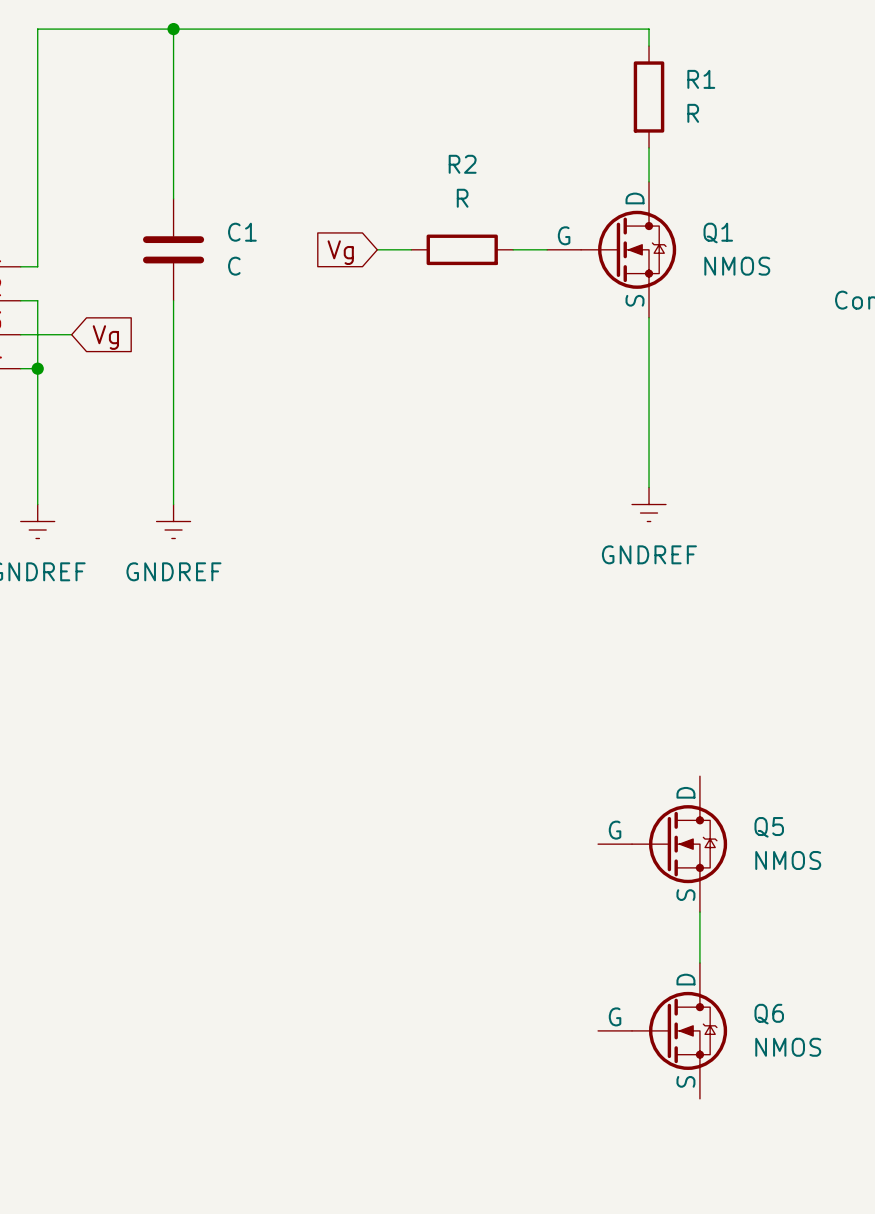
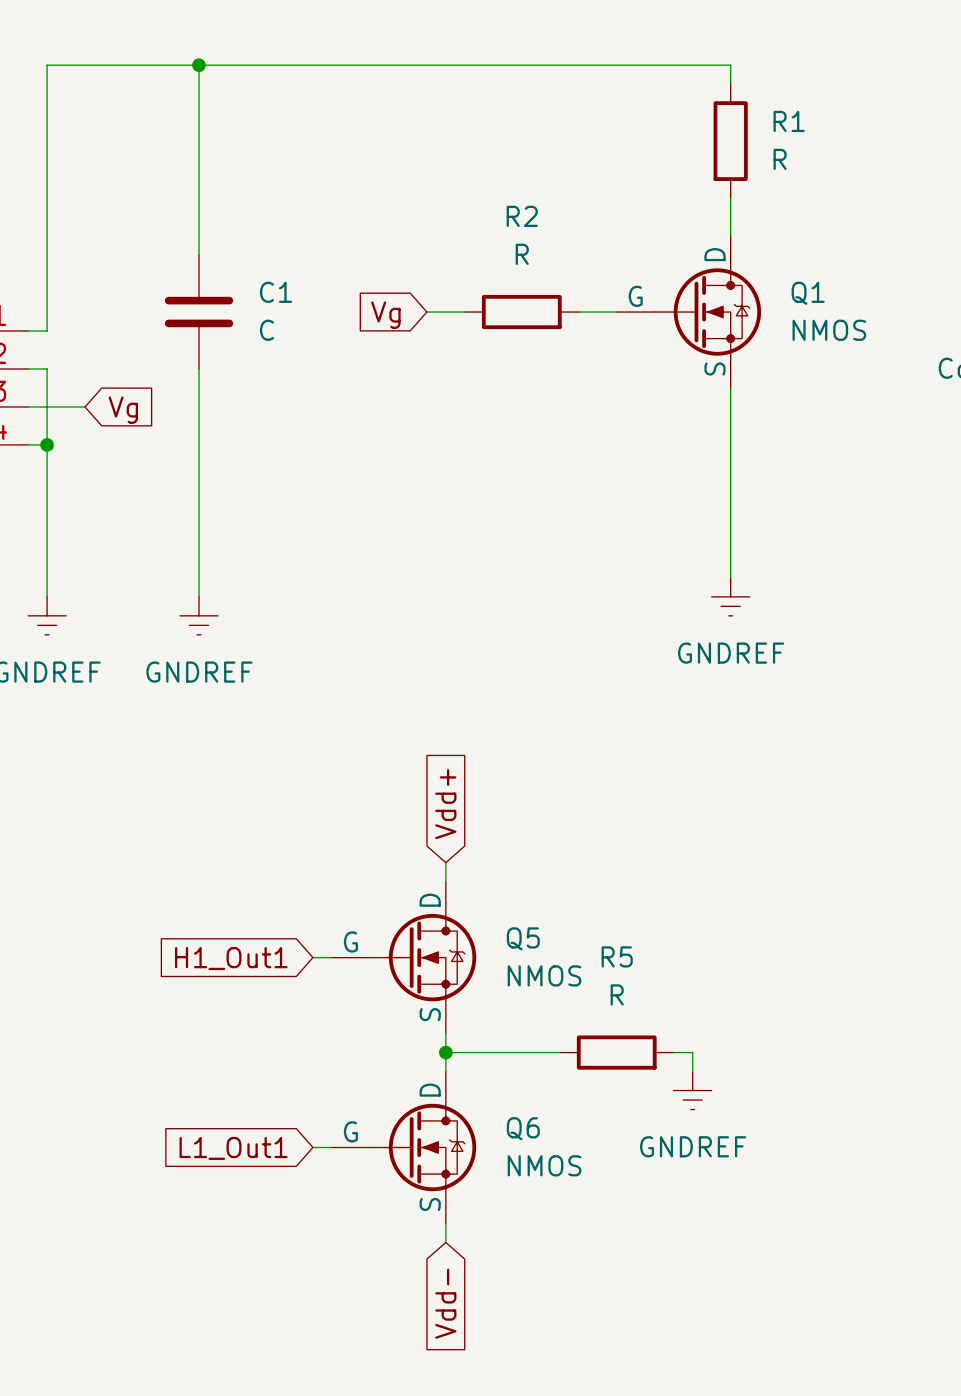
global label: none -> Vdd+ (445, 804)
wire: none -> (445, 862) (445, 881)
global label: none -> H1_Out1 (231, 958)
wire: none -> (312, 957) (331, 957)
Q5 position: (662, 844) -> (404, 957)
wire: none -> (445, 1033) (445, 1071)
wire: none -> (445, 1052) (559, 1052)
junction: none -> (445, 1052)
R5: none -> R (616, 1052)
wire: none -> (673, 1052) (692, 1052) (692, 1071)
wire: (699, 912) (699, 963) -> none
power symbol: none -> GNDREF (692, 1090)
wire: none -> (312, 1147) (331, 1147)
global label: none -> L1_Out1 (233, 1148)
Q6 position: (662, 1030) -> (404, 1147)
wire: none -> (445, 1223) (445, 1242)
global label: none -> Vdd- (445, 1303)

